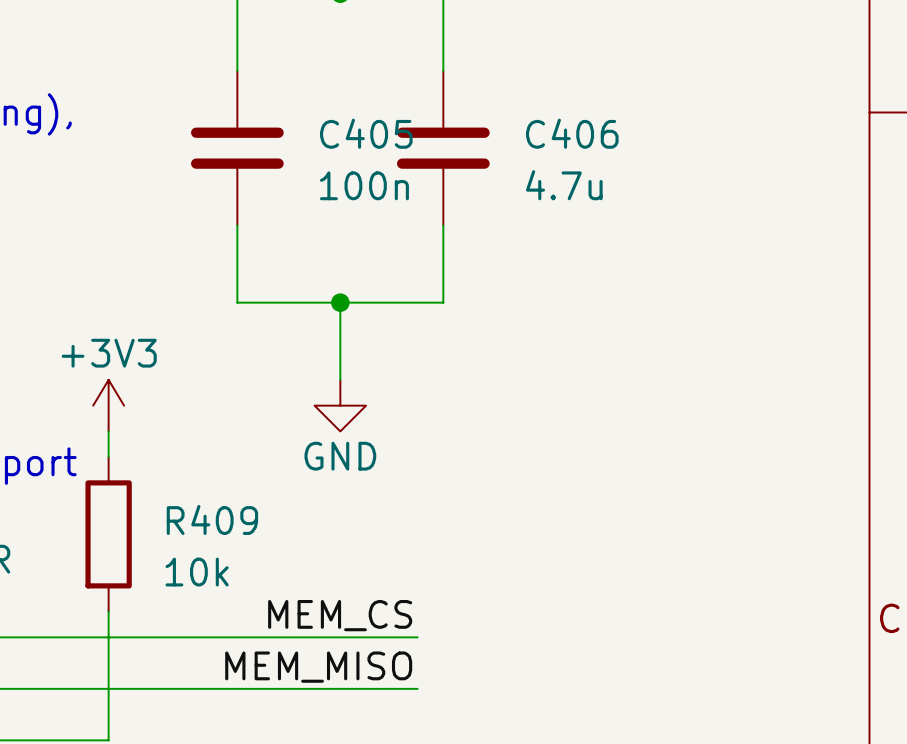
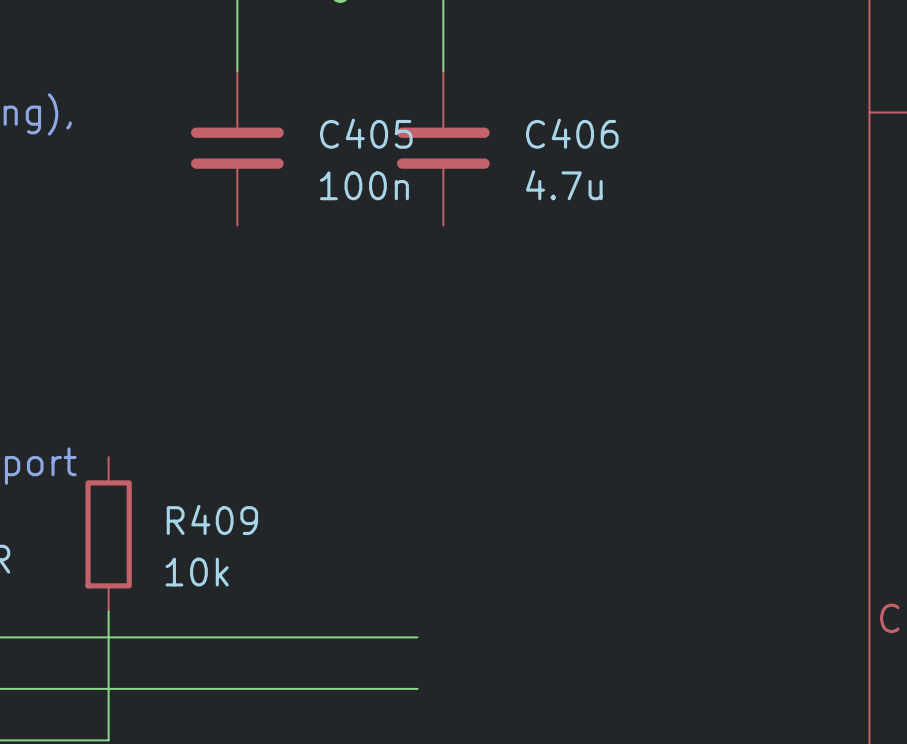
wire: (237, 225) (237, 302) (443, 302) (443, 225) -> none
wire: (340, 302) (340, 379) -> none
junction: (340, 302) -> none
power symbol: +3V3 (108, 405) -> none
power symbol: GND (340, 405) -> none
wire: (108, 431) (108, 457) -> none
label: MEM_CS (340, 615) -> none
label: MEM_MISO (318, 667) -> none

